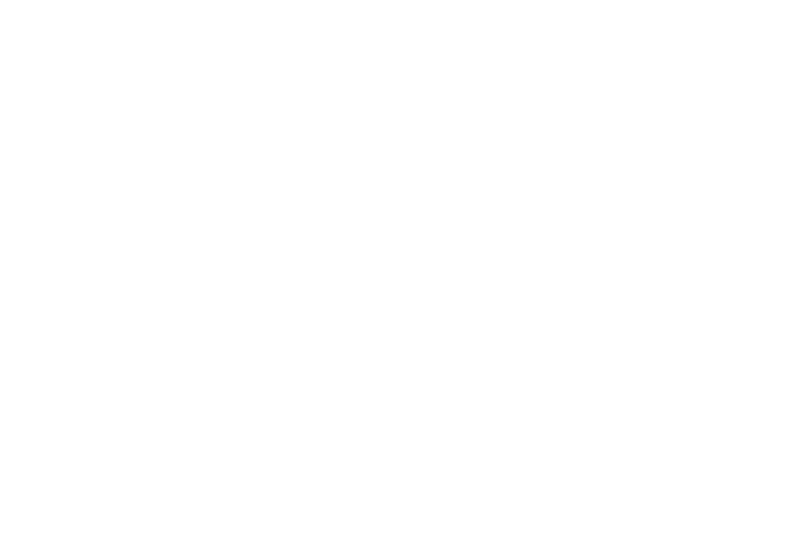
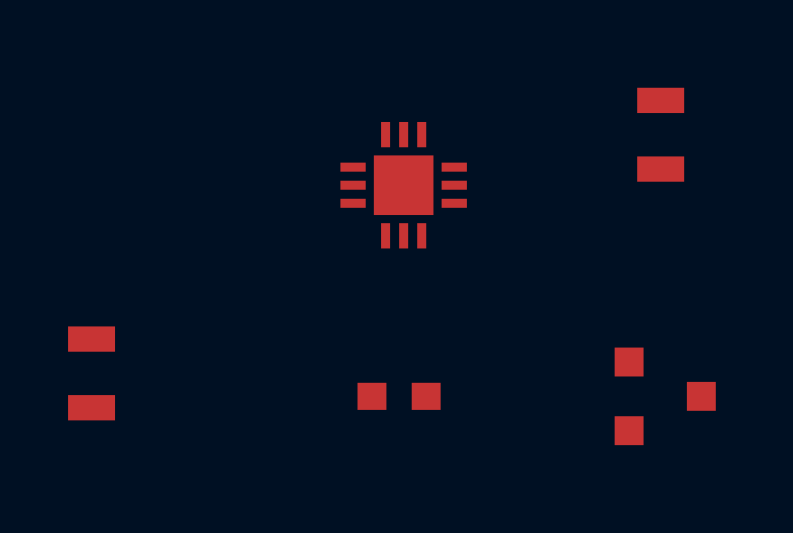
part: none -> (660, 134)
part: none -> (403, 185)
part: none -> (91, 373)
part: none -> (399, 396)
part: none -> (665, 396)

